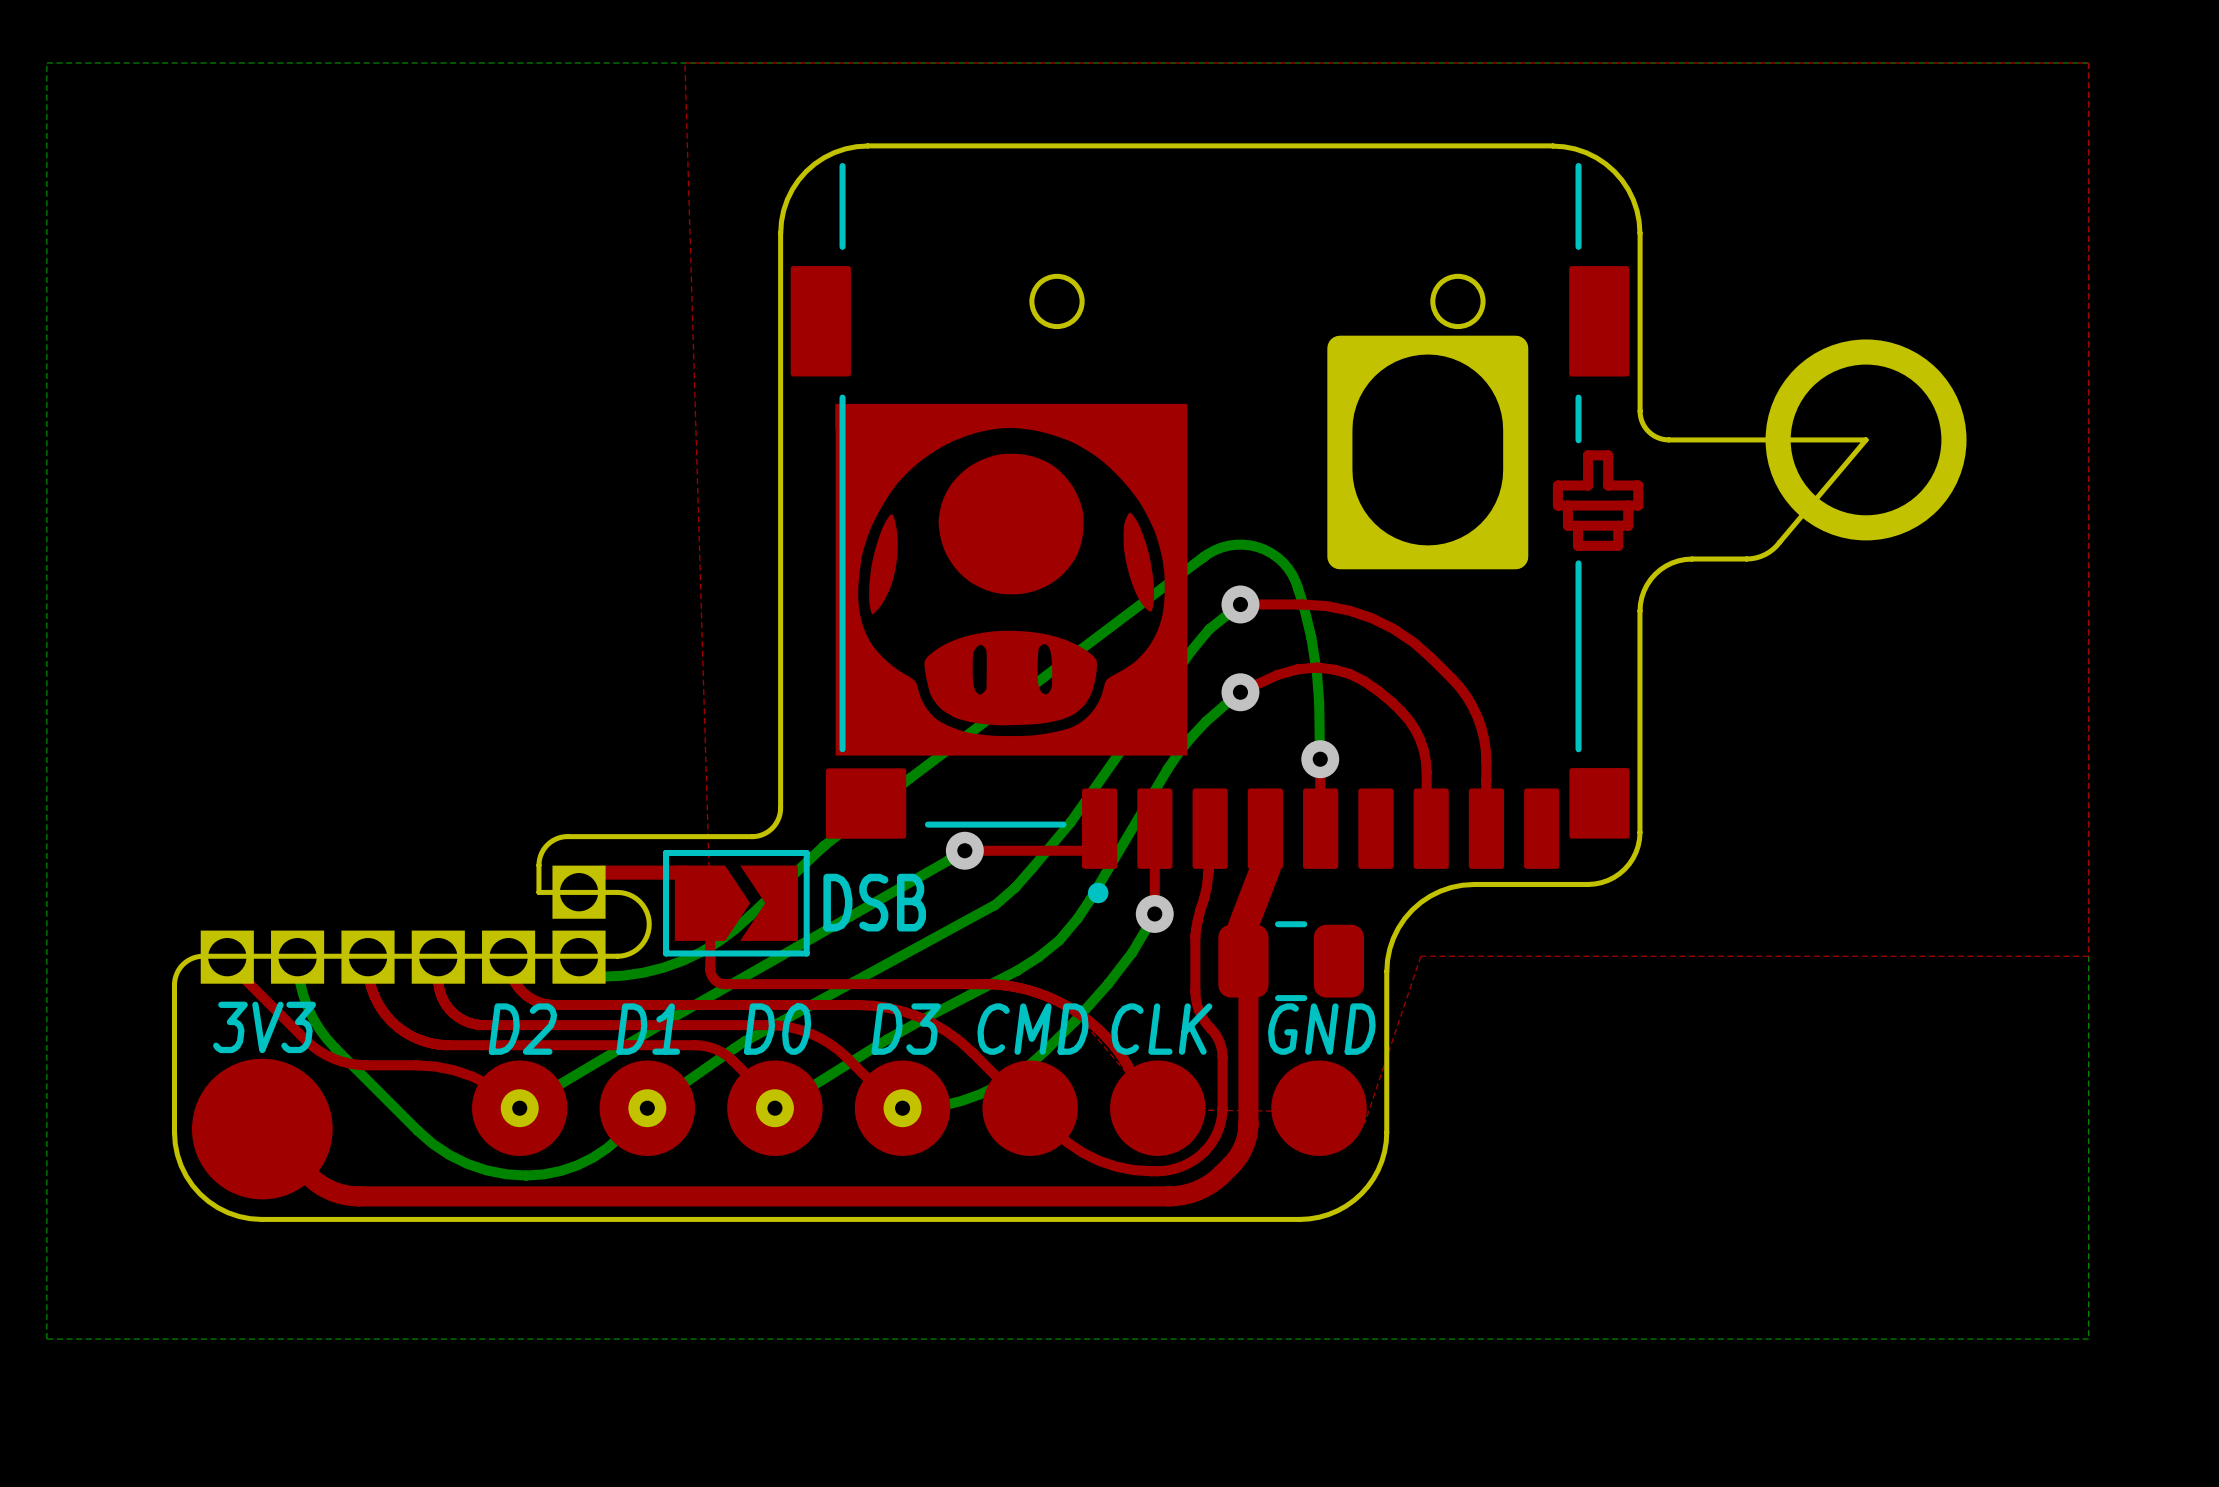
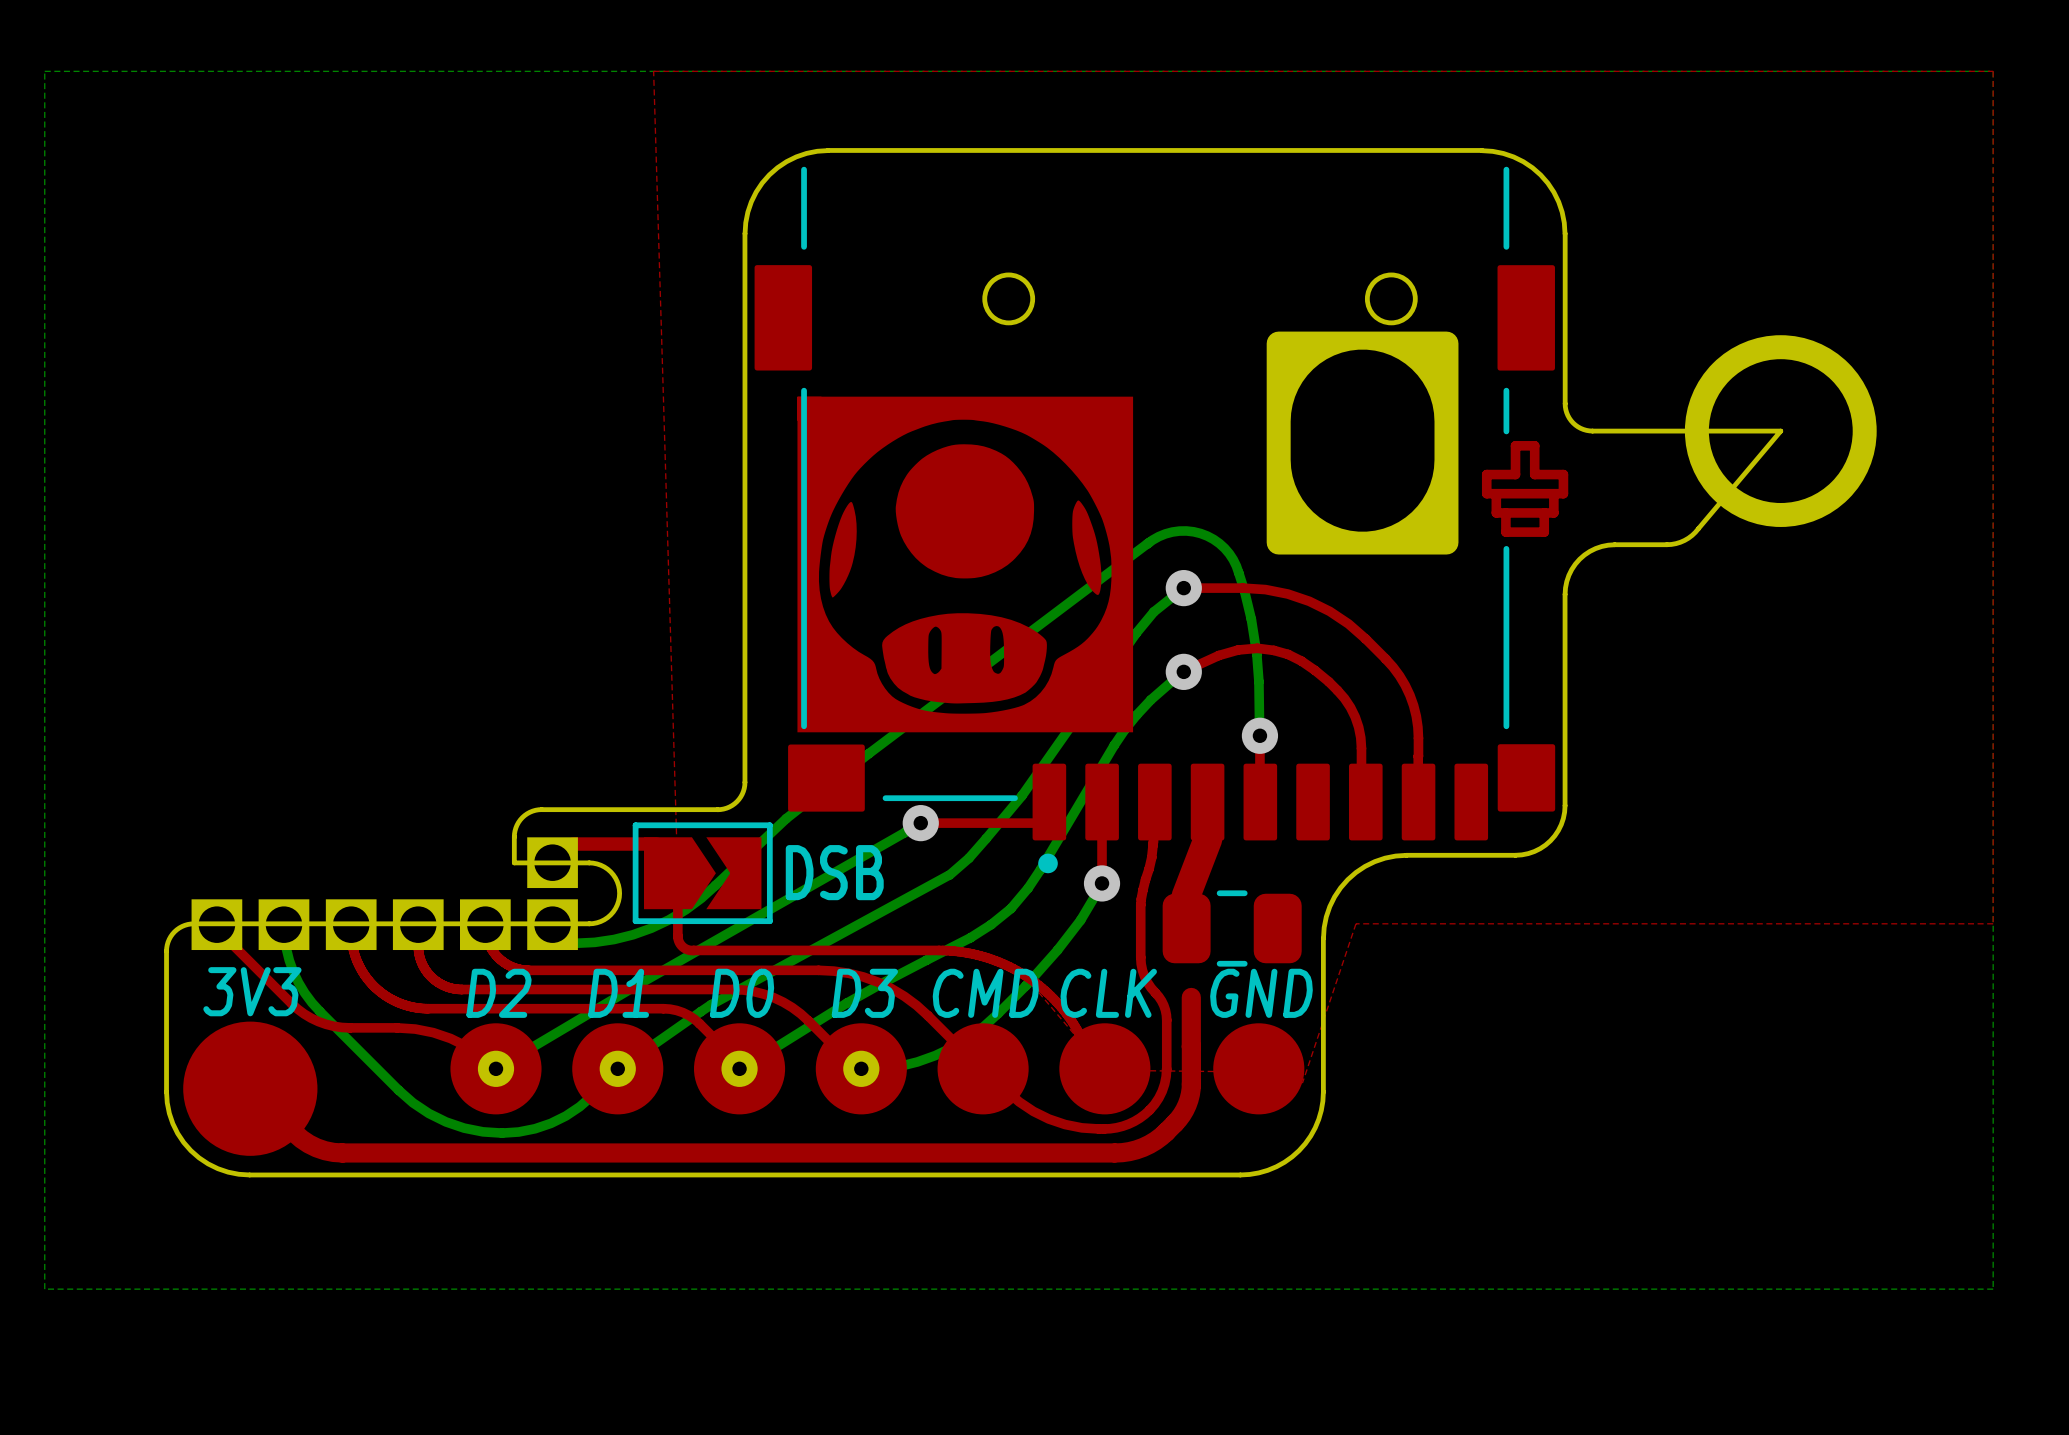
top track: (1248, 982) (1248, 1084) -> (1191, 997) (1191, 1046)

